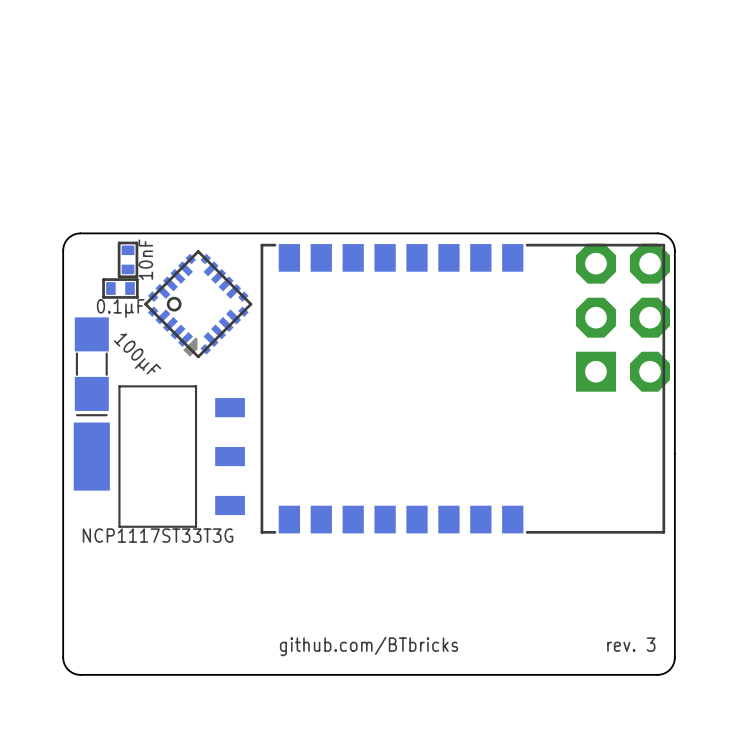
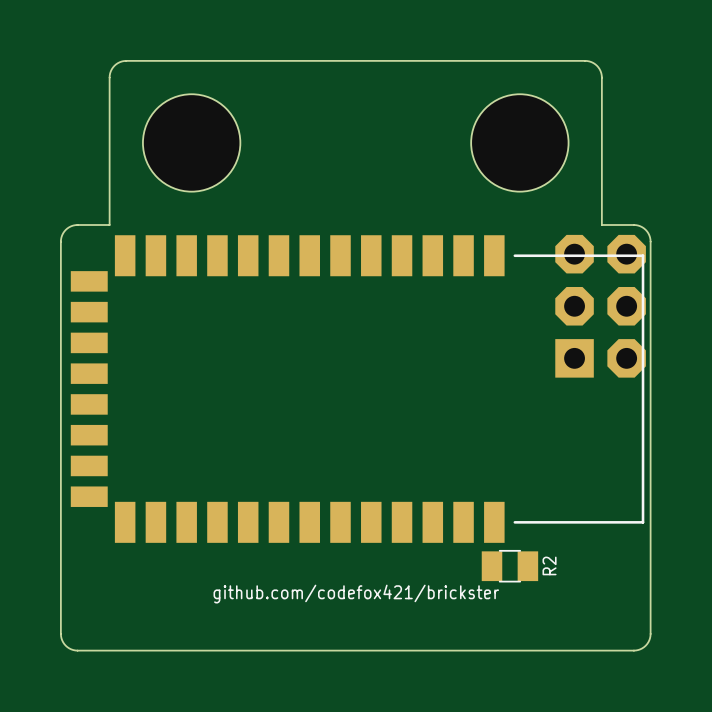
hole: none -> (191, 142)
hole: none -> (519, 142)
board edge: (624, 233) (113, 233) -> (601, 225) (601, 75) (595, 64) (585, 60) (119, 62) (111, 69) (109, 77) (109, 225)
part: 10nF (128, 259) -> none
part: 0.1µF (120, 288) -> none
part: (198, 304) -> none
part: 100µF (91, 366) -> none
part: (462, 388) -> none
part: none -> (357, 389)
NCP1117ST33T3G: (159, 456) -> none
R2: none -> (509, 566)
text: none -> github.com/codefox421/brickster (356, 594)
text: rev. 3 (631, 644) -> none
text: github.com/BTbricks (369, 646) -> none

